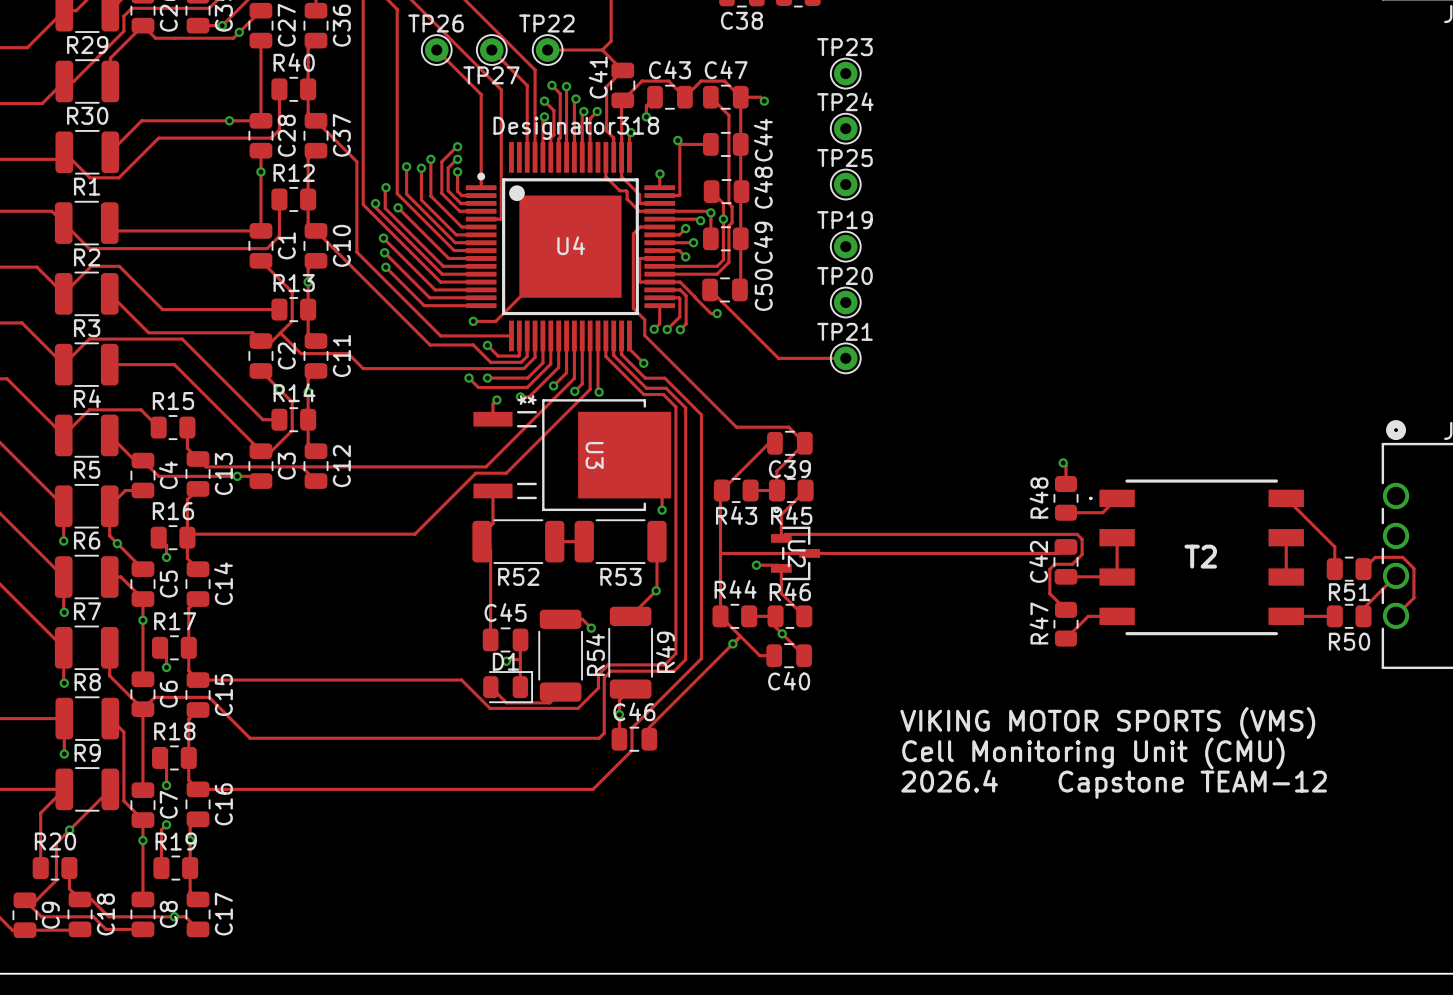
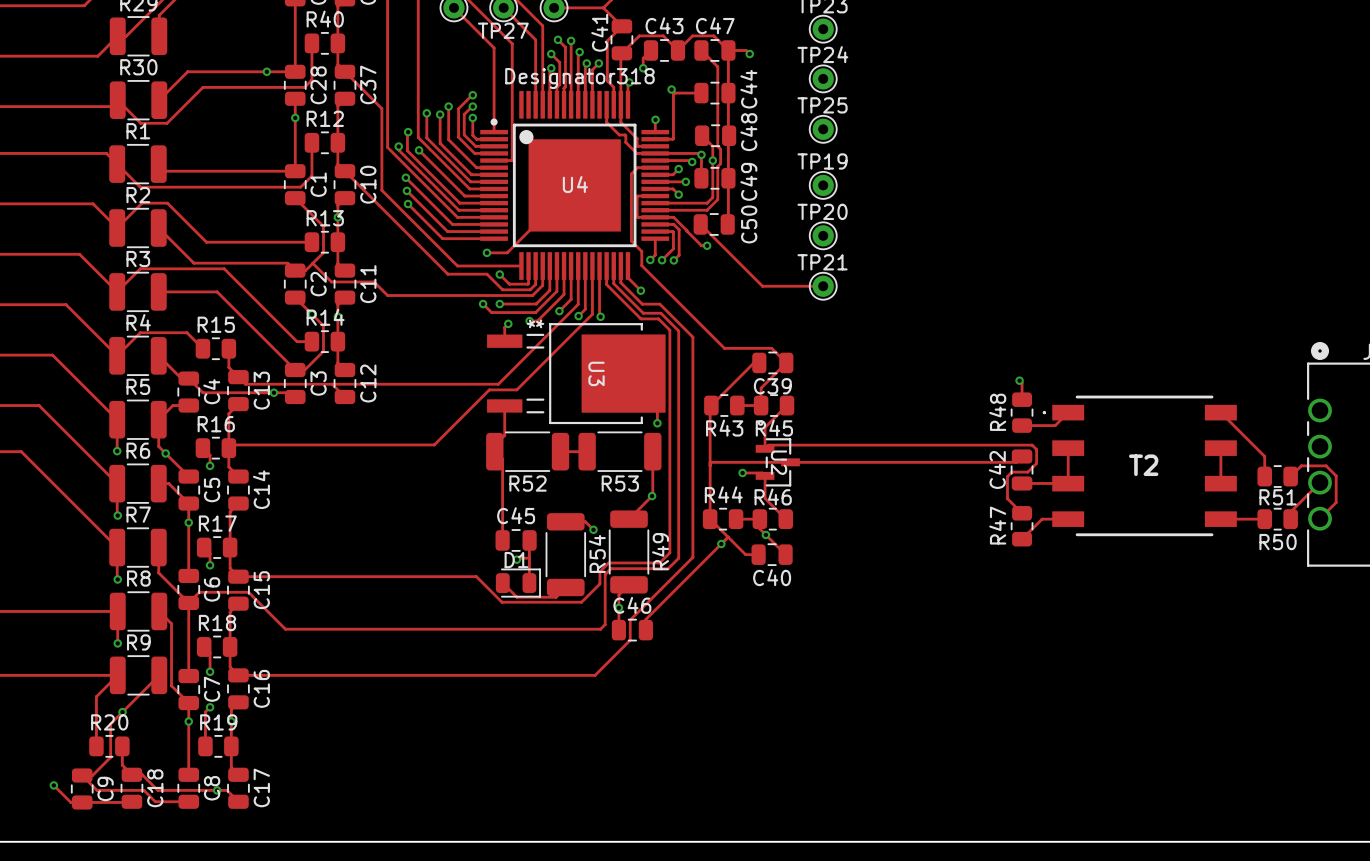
text: VIKING MOTOR SPORTS (VMS) (1107, 723) -> none
text: Cell Monitoring Unit (CMU) (1093, 753) -> none
text: 2026.4 Capstone TEAM-12 (1114, 784) -> none

